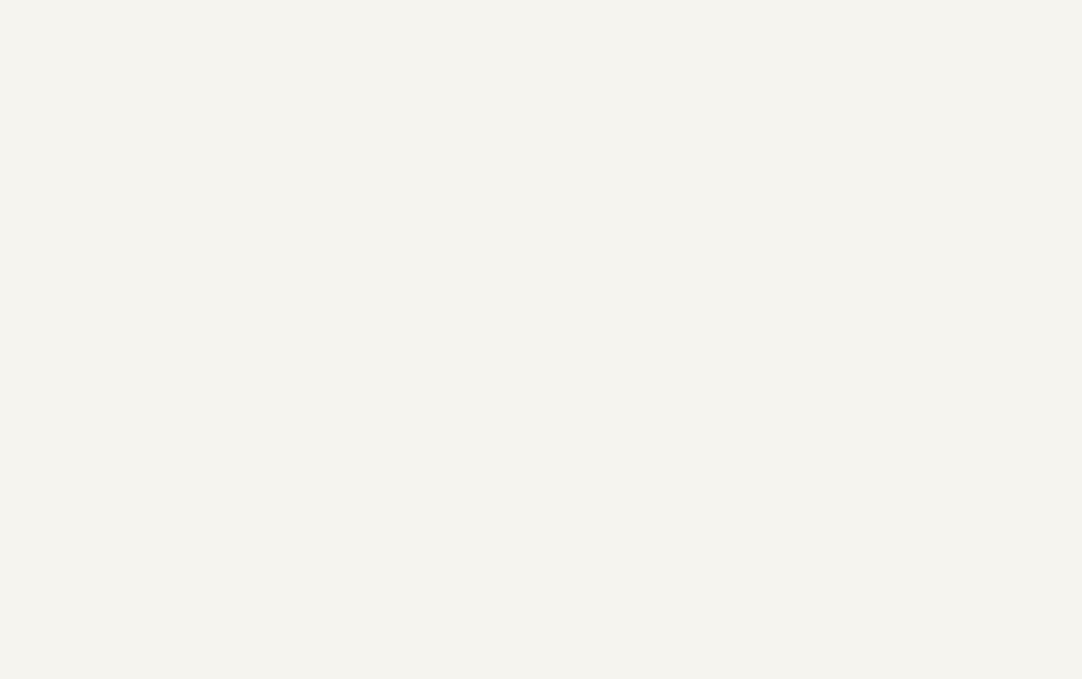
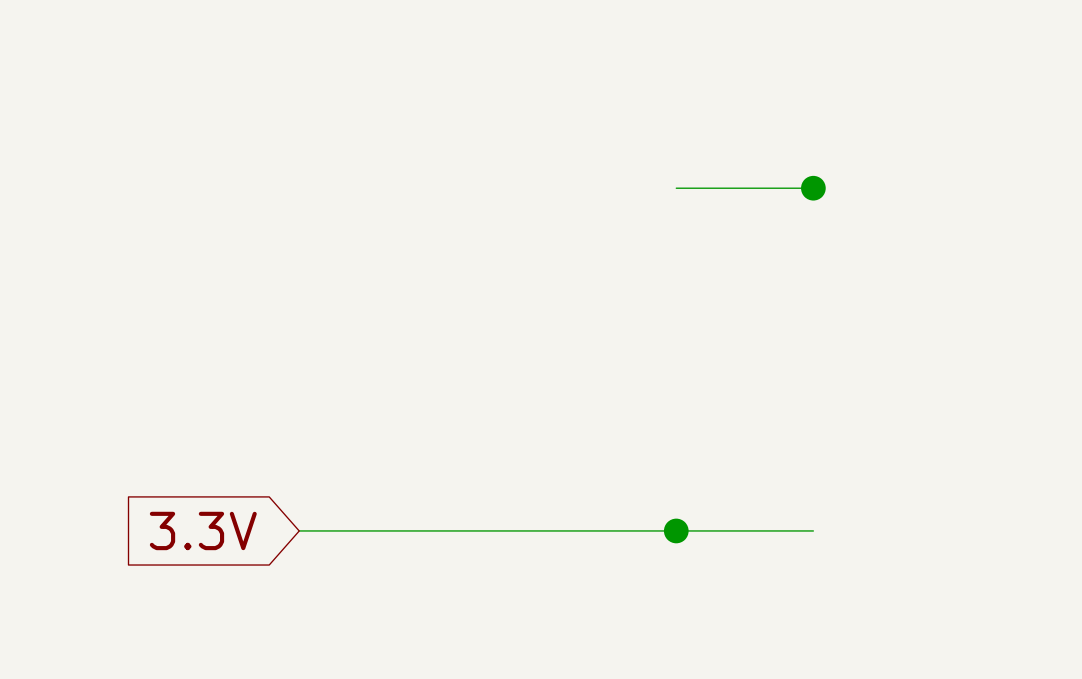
wire: none -> (676, 188) (813, 188)
junction: none -> (813, 188)
global label: none -> 3.3V (203, 530)
wire: none -> (299, 530) (813, 530)
junction: none -> (676, 530)

